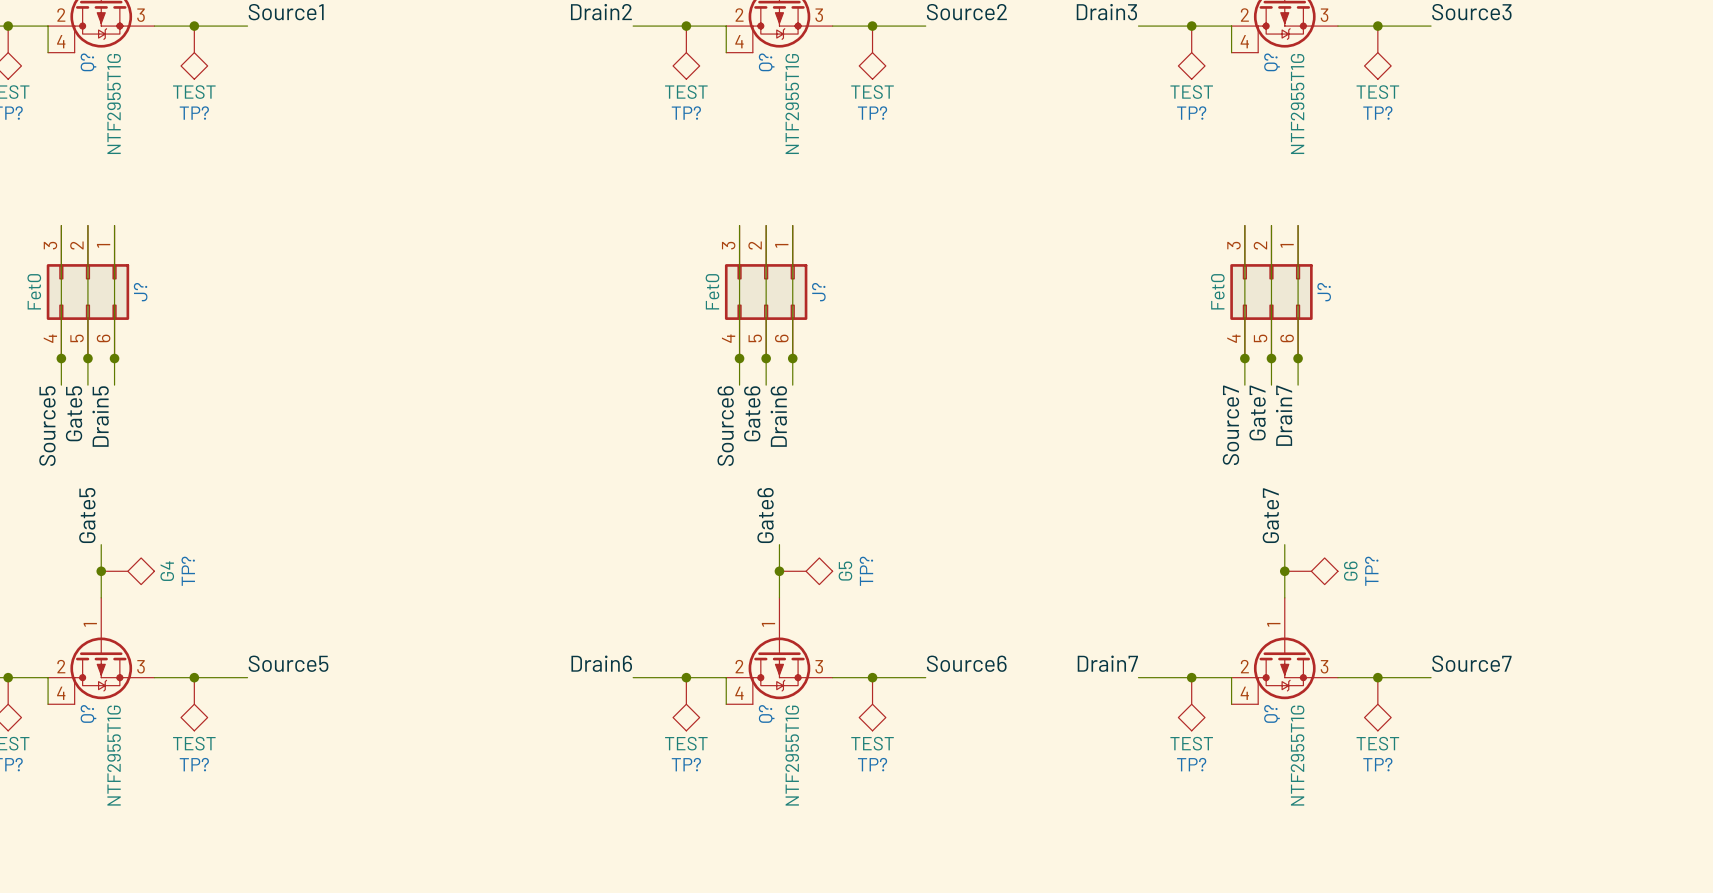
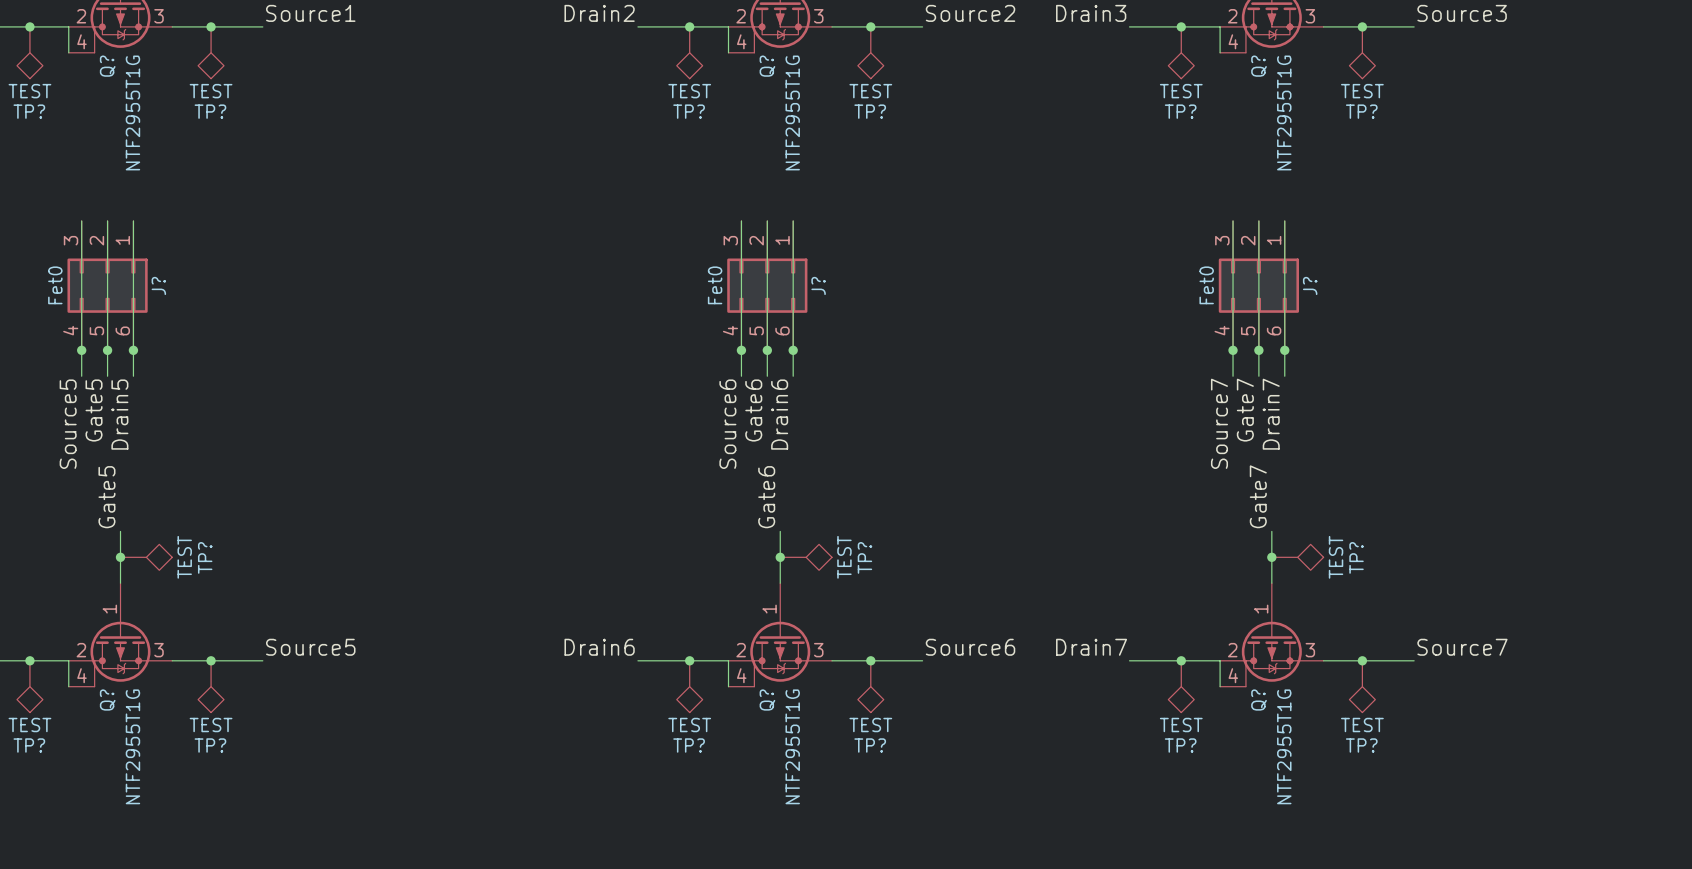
TP? value: G4 (167, 571) -> TEST (184, 557)
TP? value: G5 (845, 571) -> TEST (844, 557)
TP? value: G6 (1350, 571) -> TEST (1336, 557)

